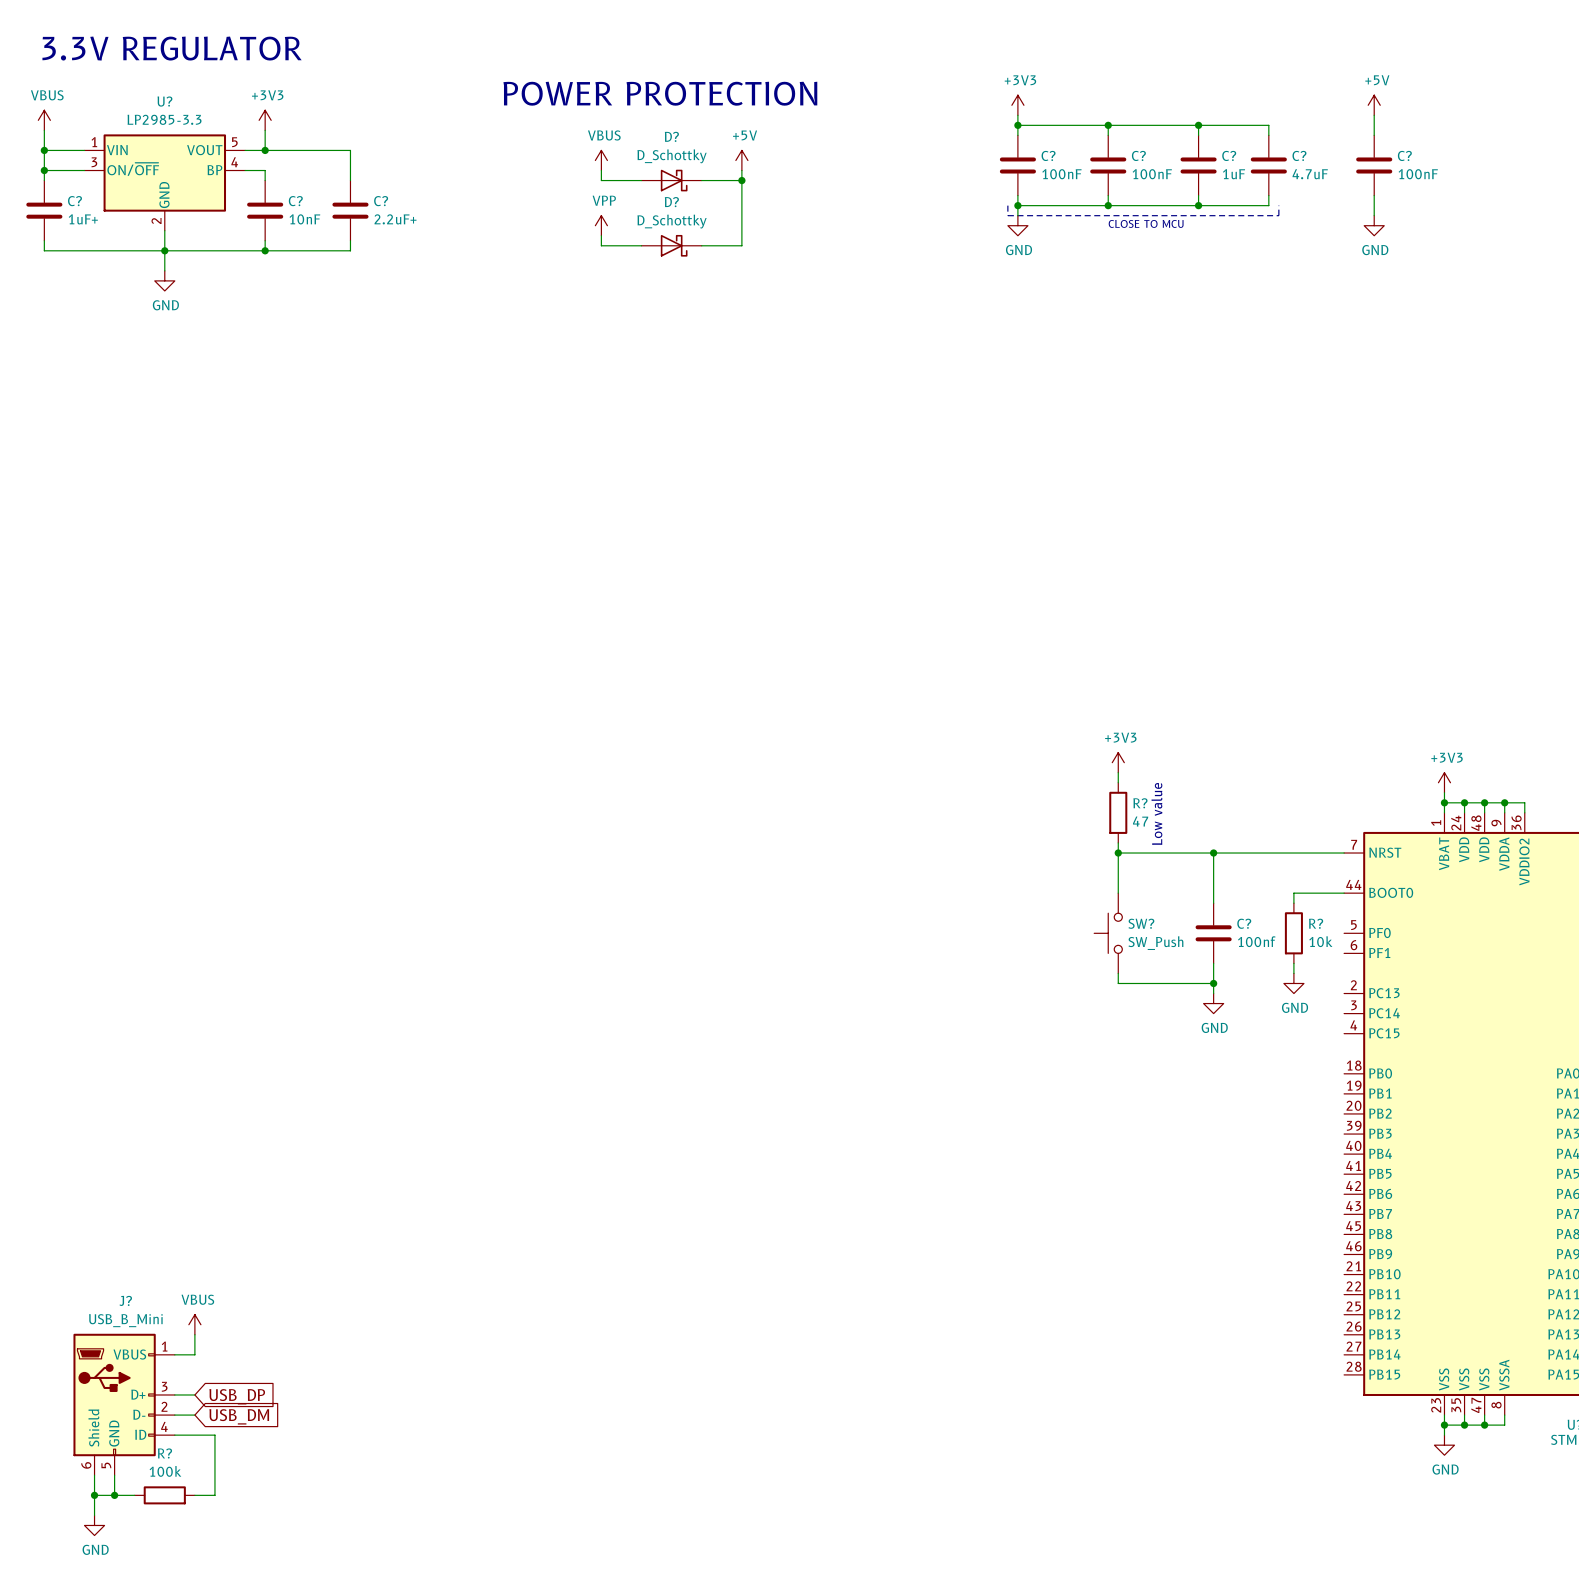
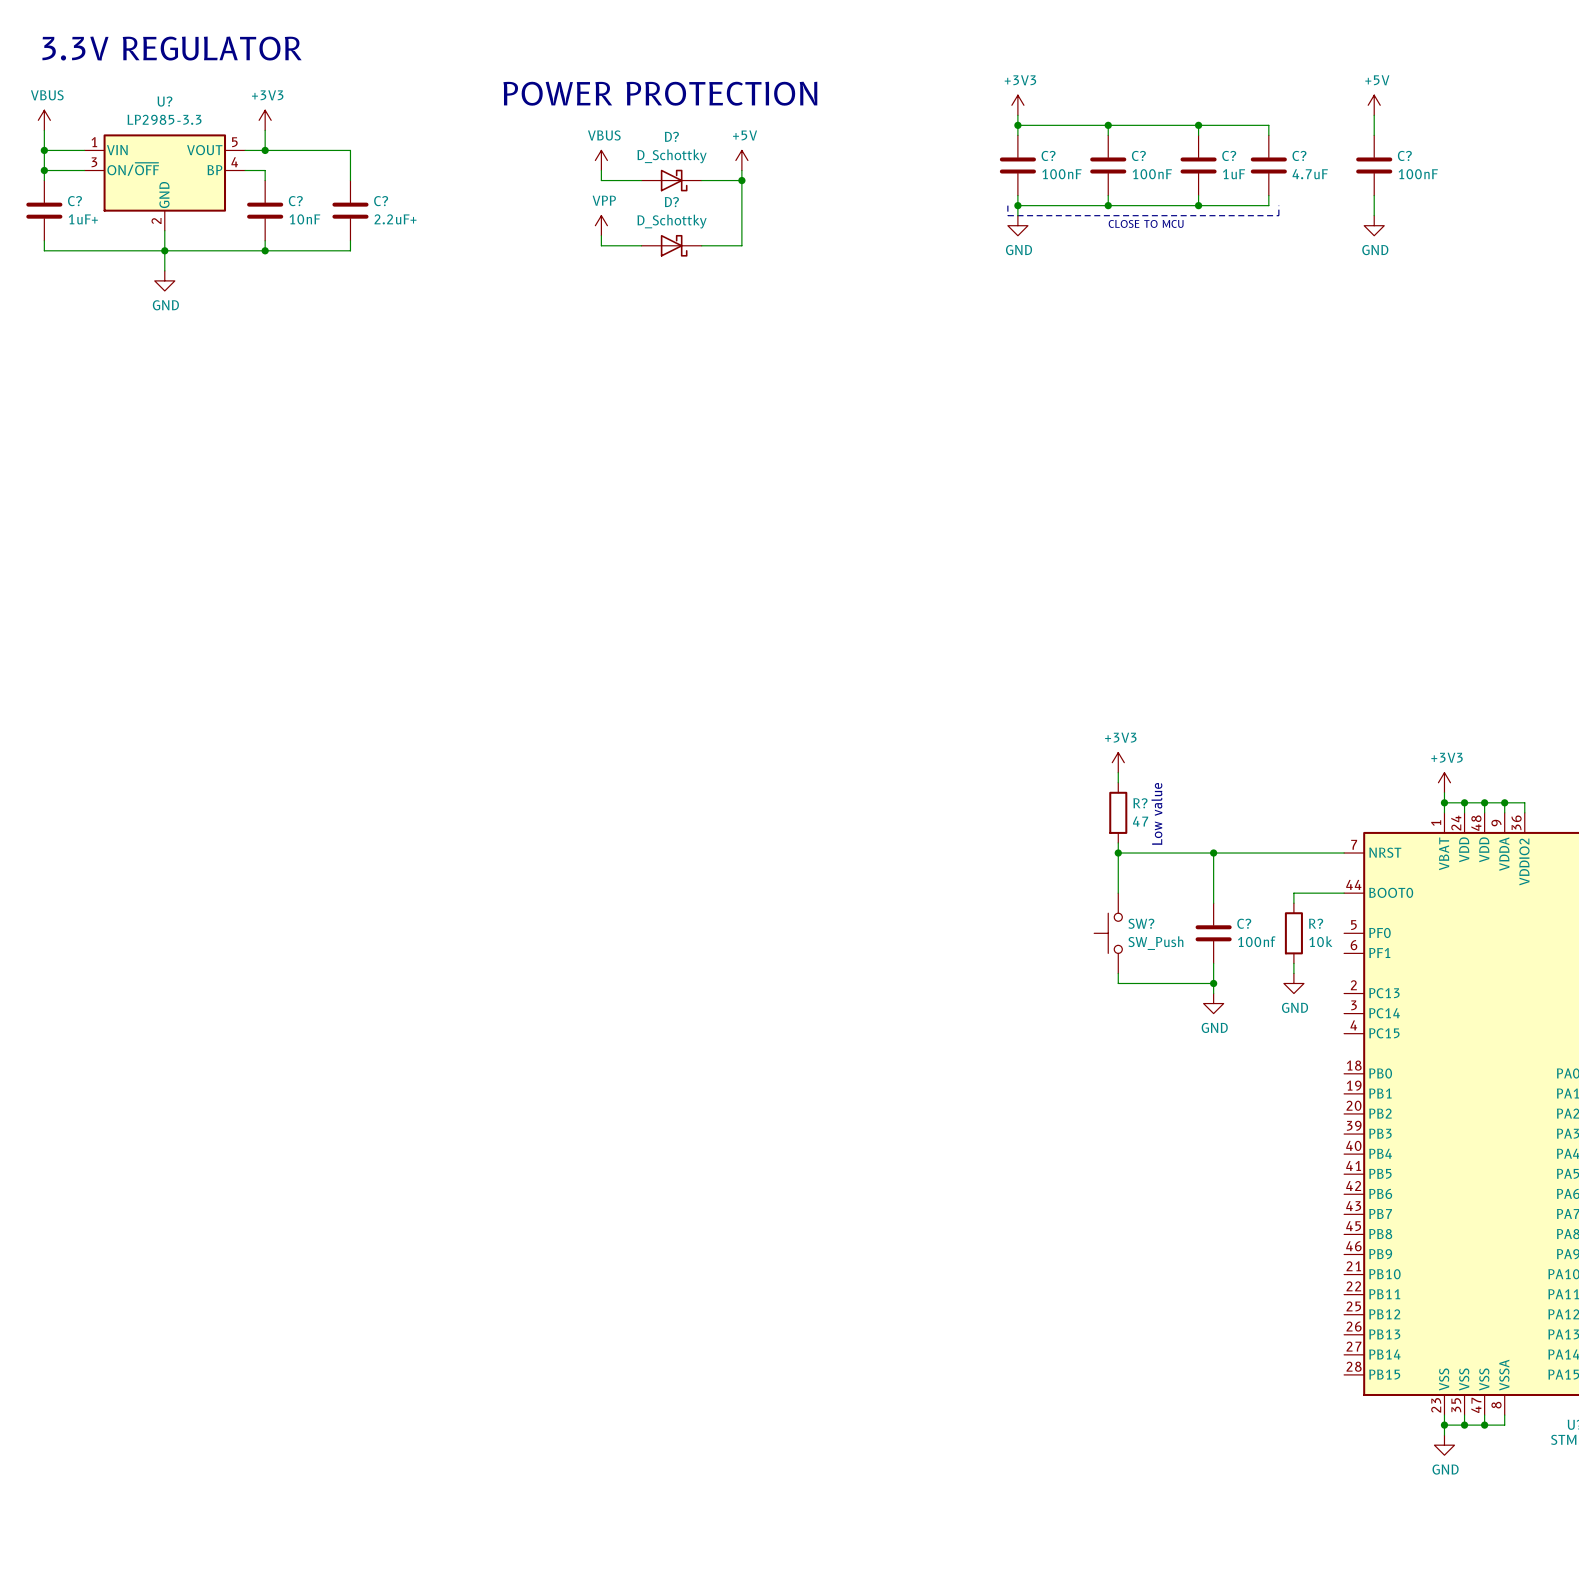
power symbol: VBUS (194, 1324) -> none
wire: (194, 1334) (194, 1354) (174, 1354) -> none
wire: (174, 1394) (194, 1394) -> none
global label: USB_DP (237, 1396) -> none
J?: USB_B_Mini (124, 1404) -> none
wire: (174, 1415) (194, 1415) -> none
global label: USB_DM (239, 1416) -> none
wire: (174, 1435) (214, 1435) (214, 1495) (194, 1495) -> none
wire: (94, 1475) (94, 1515) -> none
wire: (114, 1475) (114, 1495) -> none
wire: (94, 1495) (134, 1495) -> none
junction: (94, 1495) -> none
junction: (114, 1495) -> none
R?: 100k (164, 1495) -> none
power symbol: GND (94, 1525) -> none

